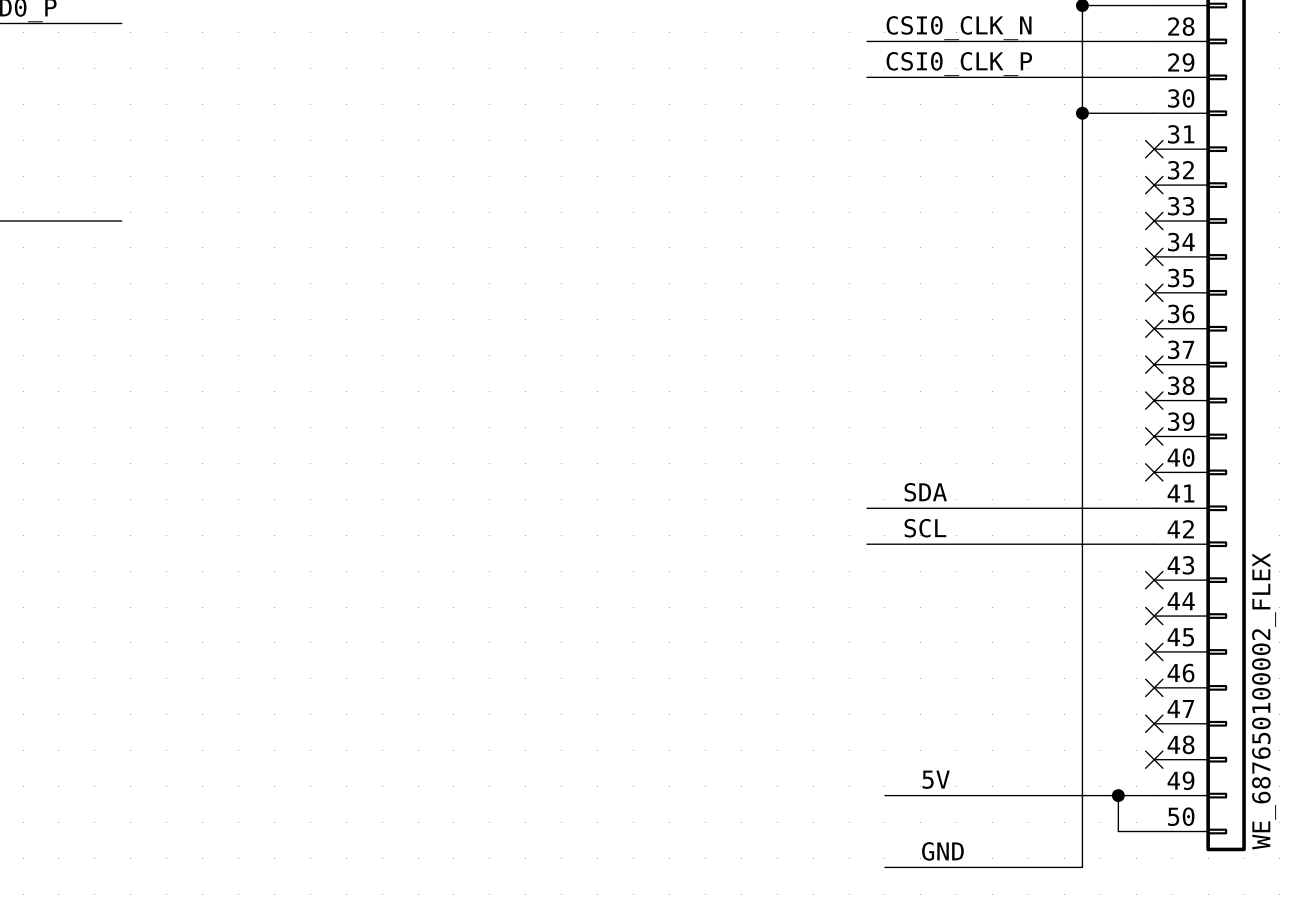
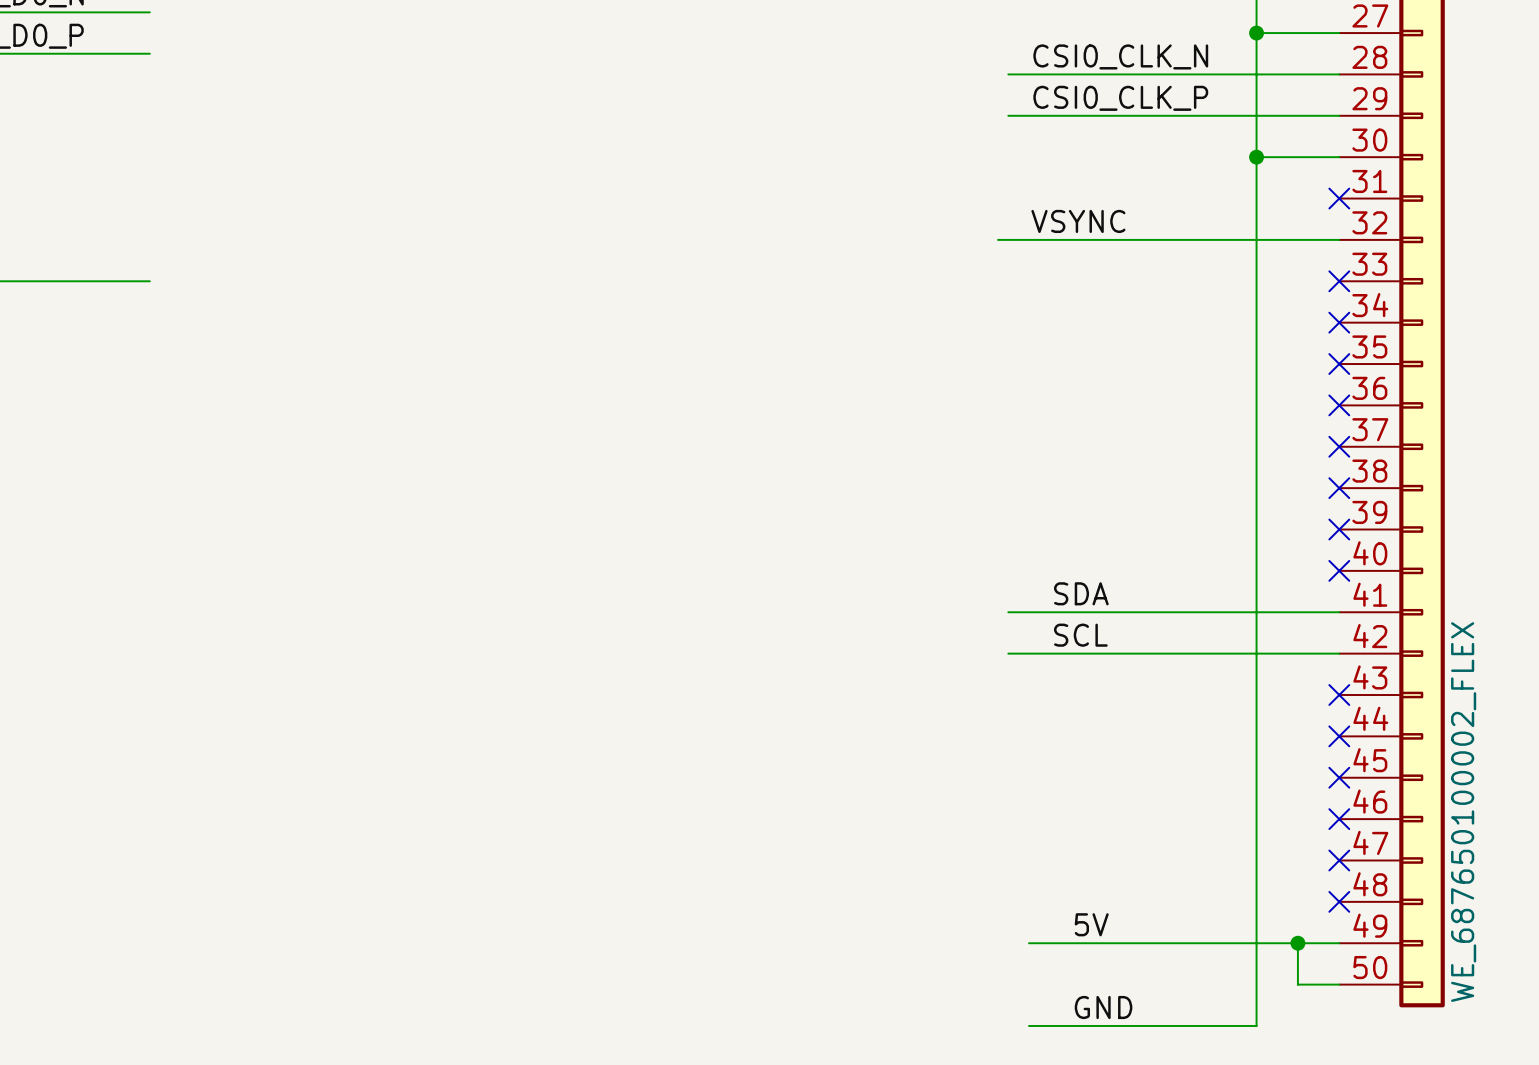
label: none -> VSYNC (1078, 221)
wire: none -> (997, 239) (1339, 239)
no-connect mark: (1154, 185) -> none

